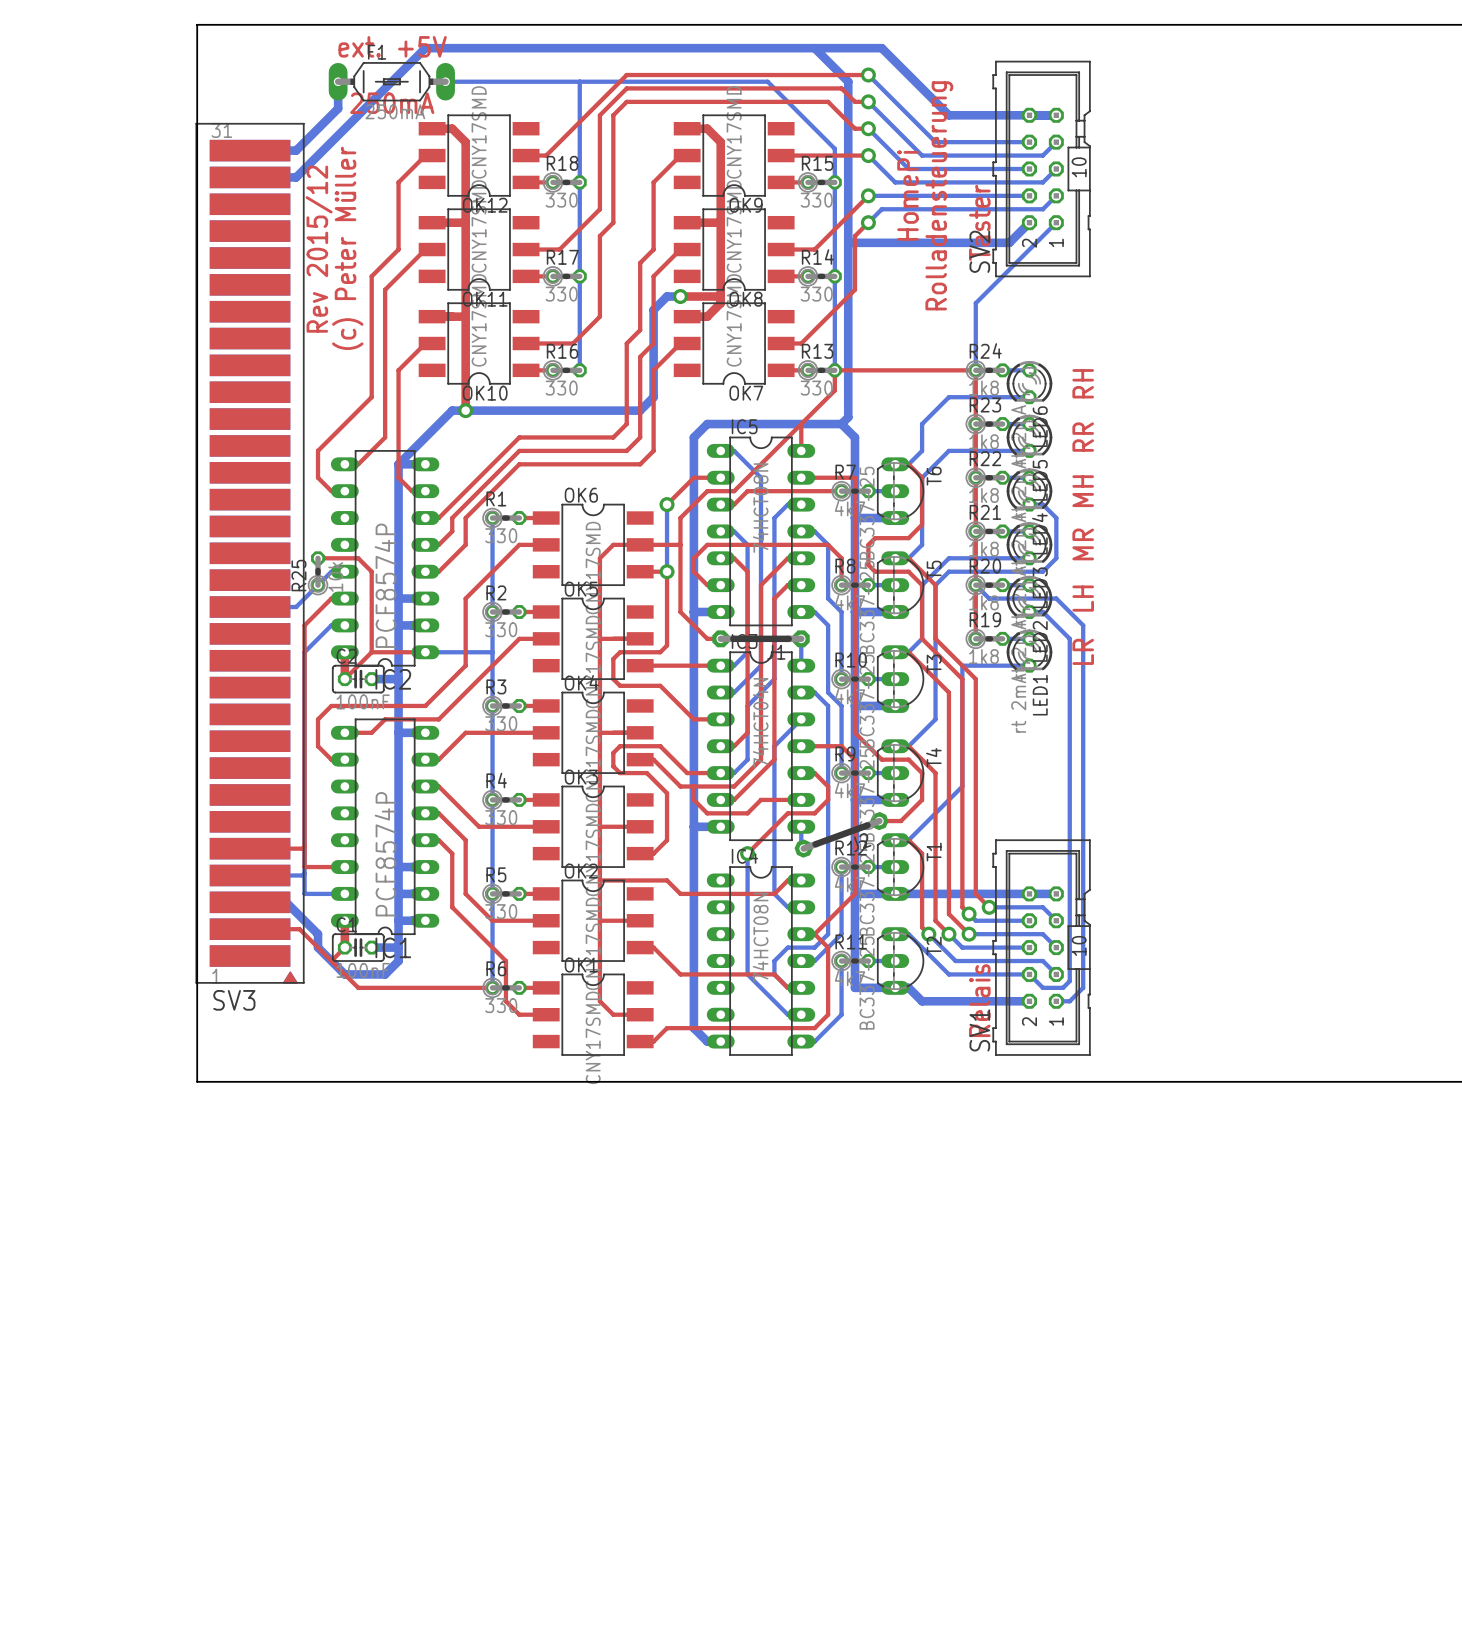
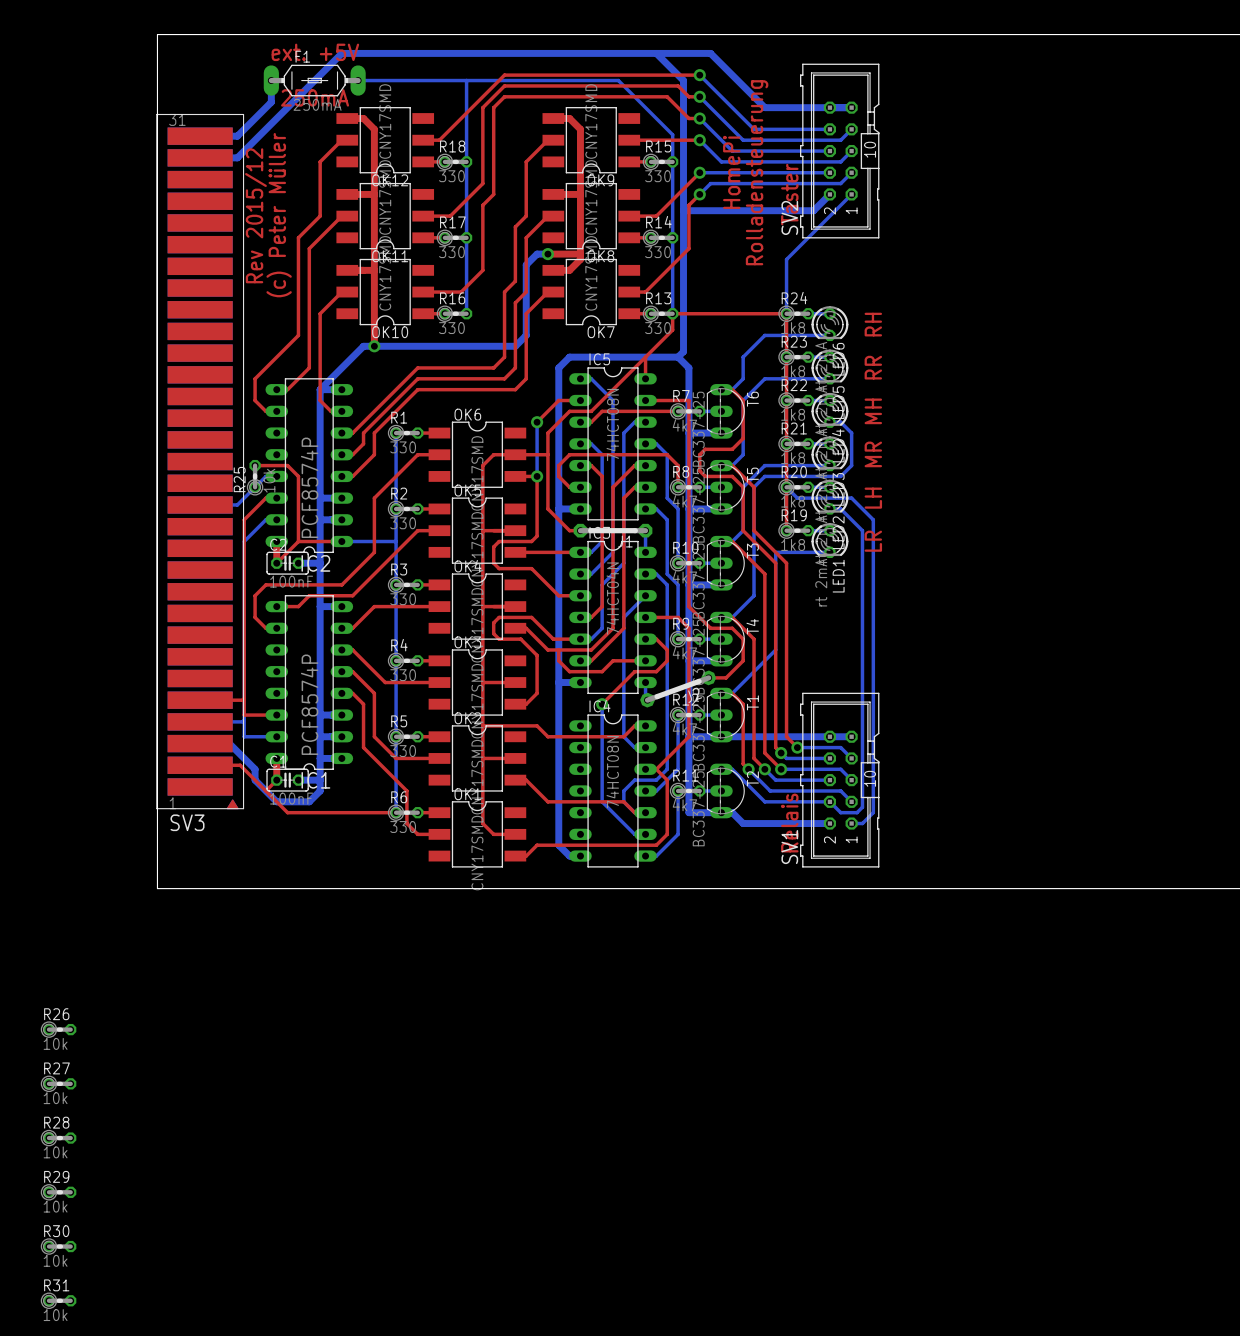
R26: none -> 10k (58, 1029)
R27: none -> 10k (58, 1083)
R28: none -> 10k (58, 1138)
R29: none -> 10k (58, 1192)
R30: none -> 10k (58, 1246)
R31: none -> 10k (58, 1300)

